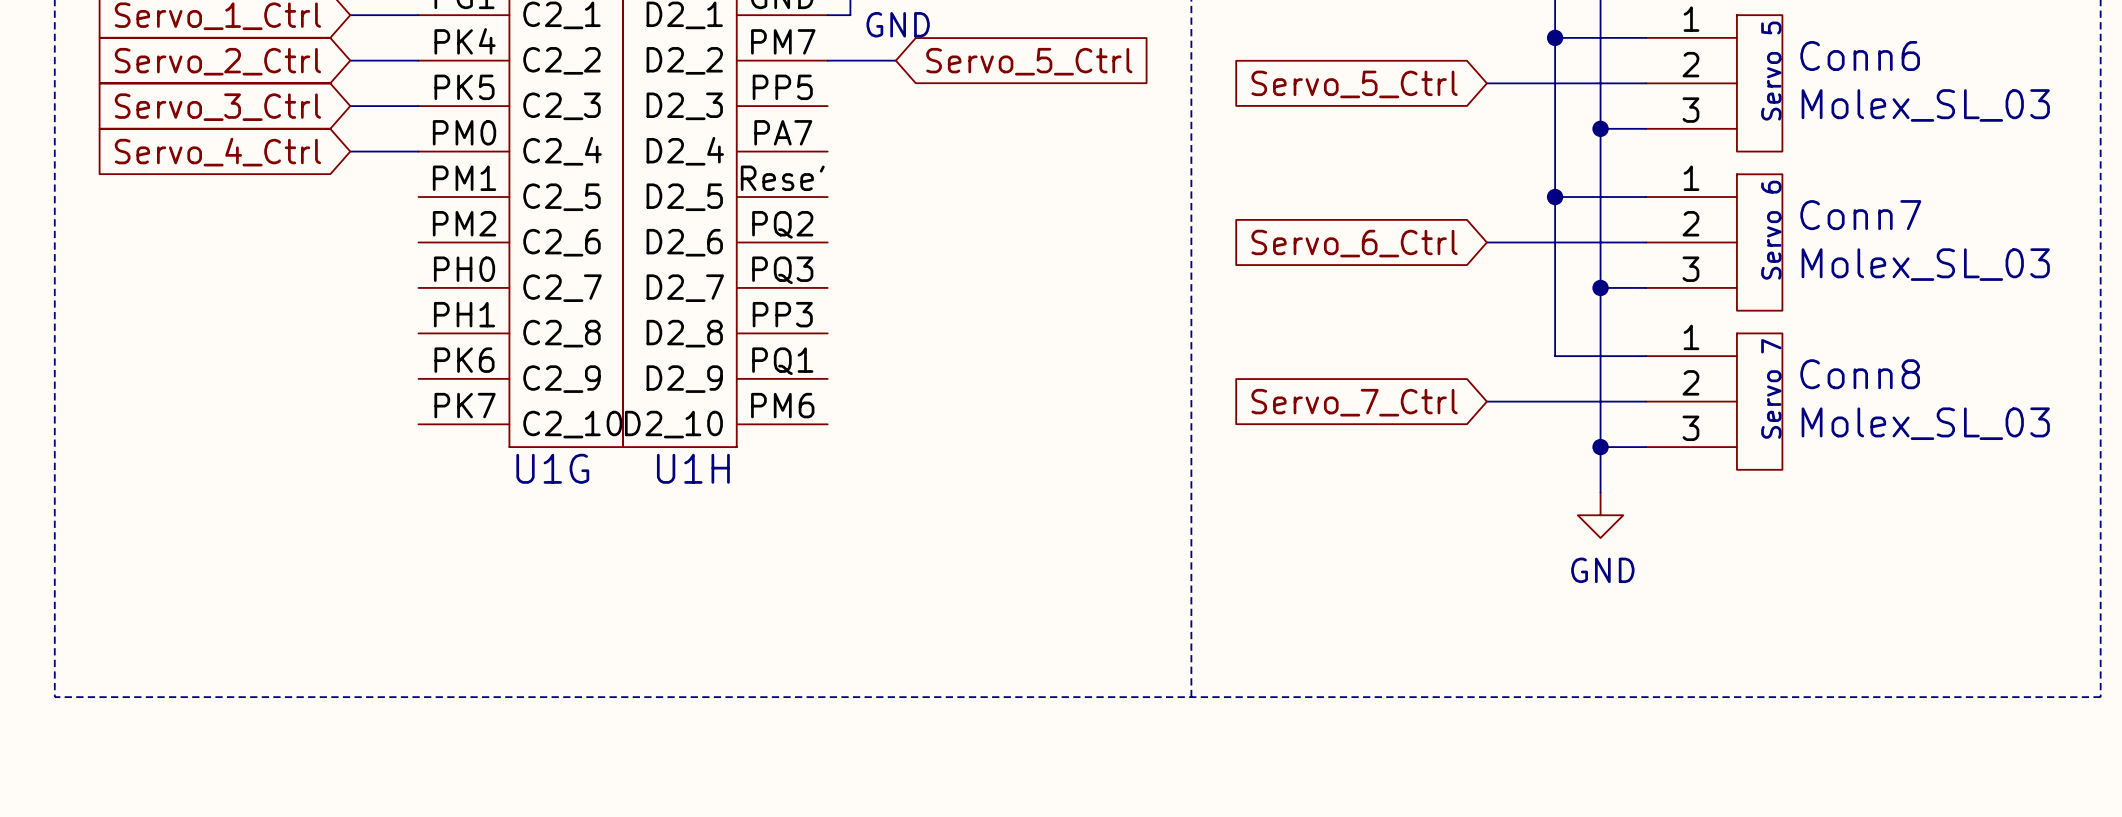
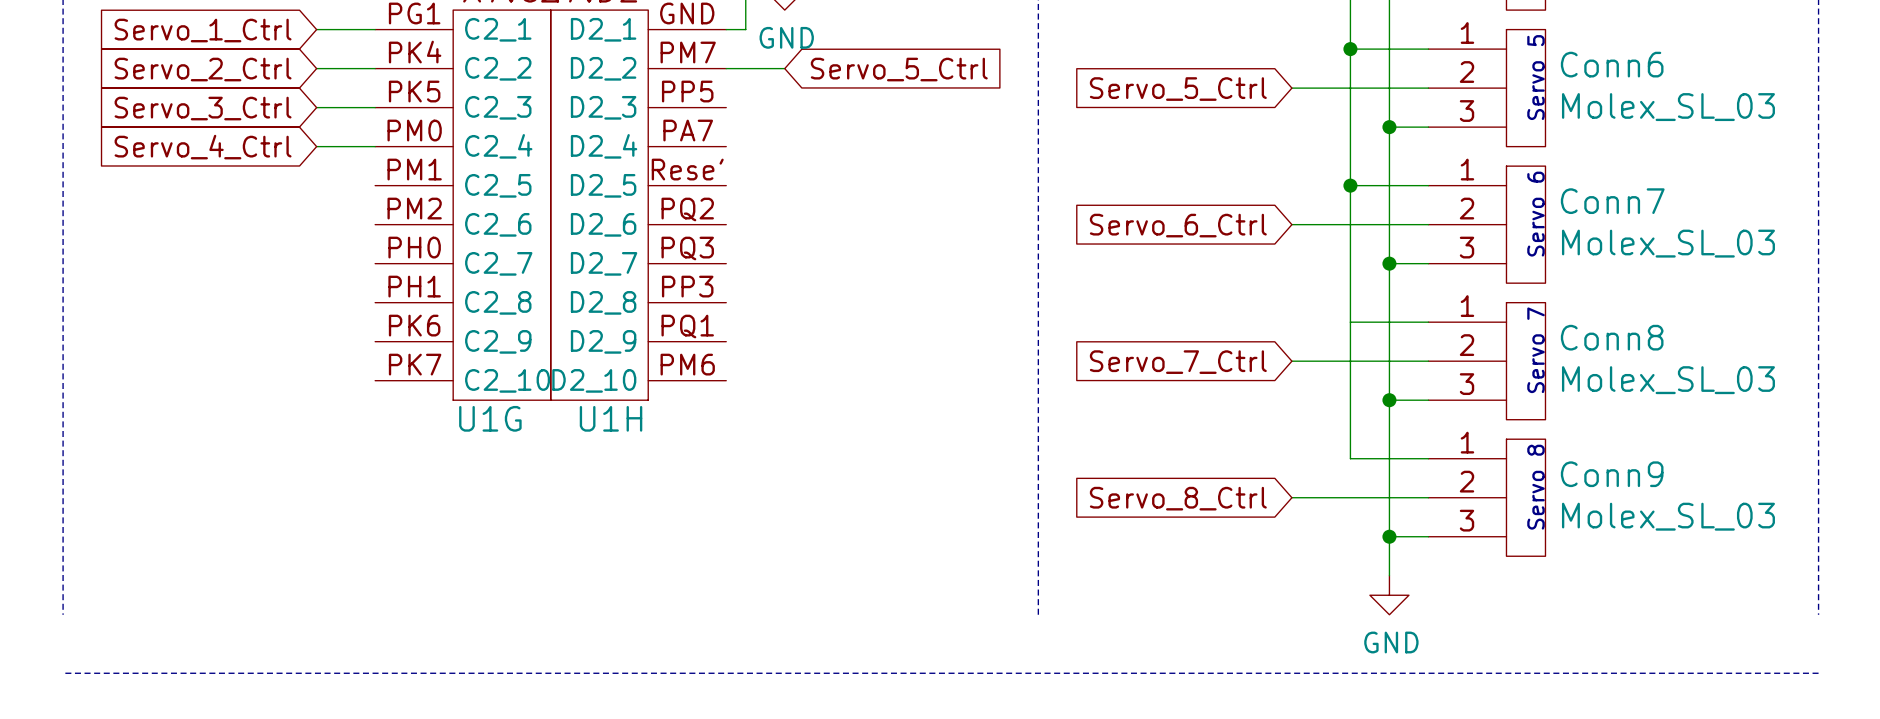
wire: none -> (1350, 322) (1350, 458) (1428, 458)
wire: none -> (1389, 439) (1389, 575)
power symbol position: GND (1600, 515) -> GND (1389, 595)
text: none -> Servo 8 (1536, 487)
wire: none -> (1291, 497) (1428, 497)
Conn9: none -> Molex_SL_03 (1486, 497)
global label: none -> Servo_8_Ctrl (1178, 498)
wire: none -> (1389, 536) (1428, 536)
junction: none -> (1389, 536)
line: (54, 697) (2100, 697) -> (63, 673) (1818, 673)

